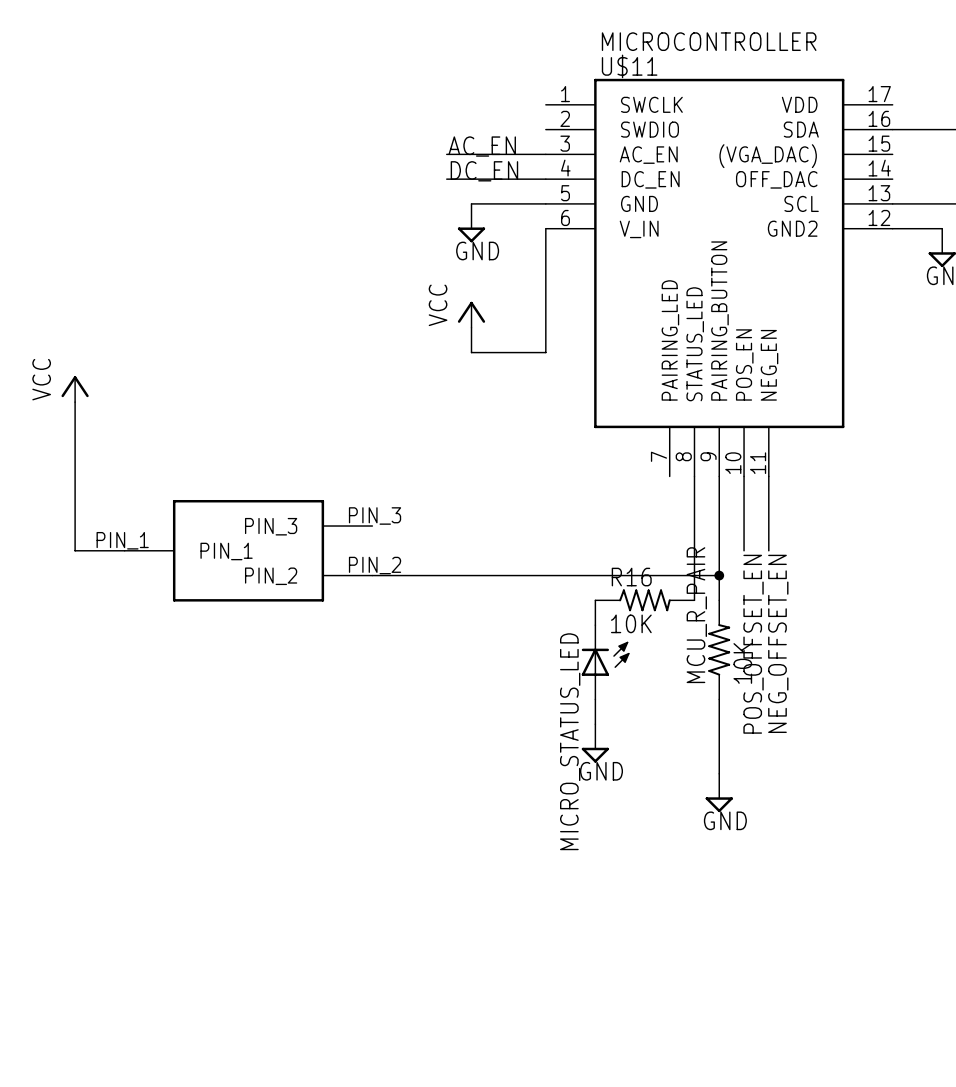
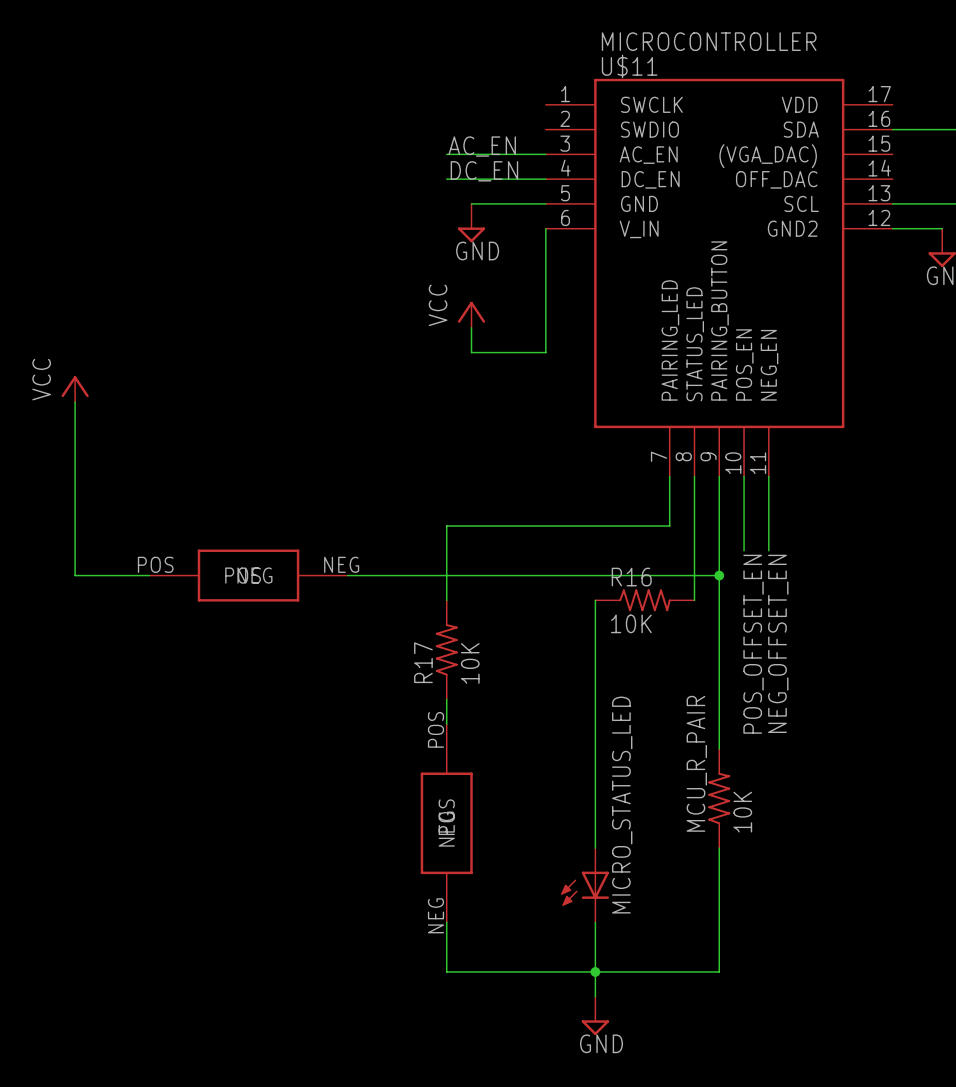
wire: none -> (669, 476) (669, 526) (446, 526) (446, 600)
wire: (75, 550) (124, 550) -> (75, 550) (75, 575) (149, 575)
part: (248, 550) -> none
part: none -> (248, 575)
R17: none -> 10K (446, 649)
MCU_R_PAIR position: (719, 649) -> (719, 798)
MICRO_STATUS_LED rotation: 0° (605, 658) -> 180° (585, 888)
MICRO_STATUS_LED position: (605, 662) -> (585, 885)
wire: none -> (446, 699) (446, 724)
wire: none -> (595, 724) (595, 848)
power symbol: GND (595, 743) -> none
power symbol: GND (719, 792) -> none
part: none -> (446, 823)
wire: none -> (719, 848) (719, 971) (446, 971) (446, 922)
wire: none -> (595, 922) (595, 996)
junction: none -> (595, 971)
power symbol: none -> GND (595, 1015)

